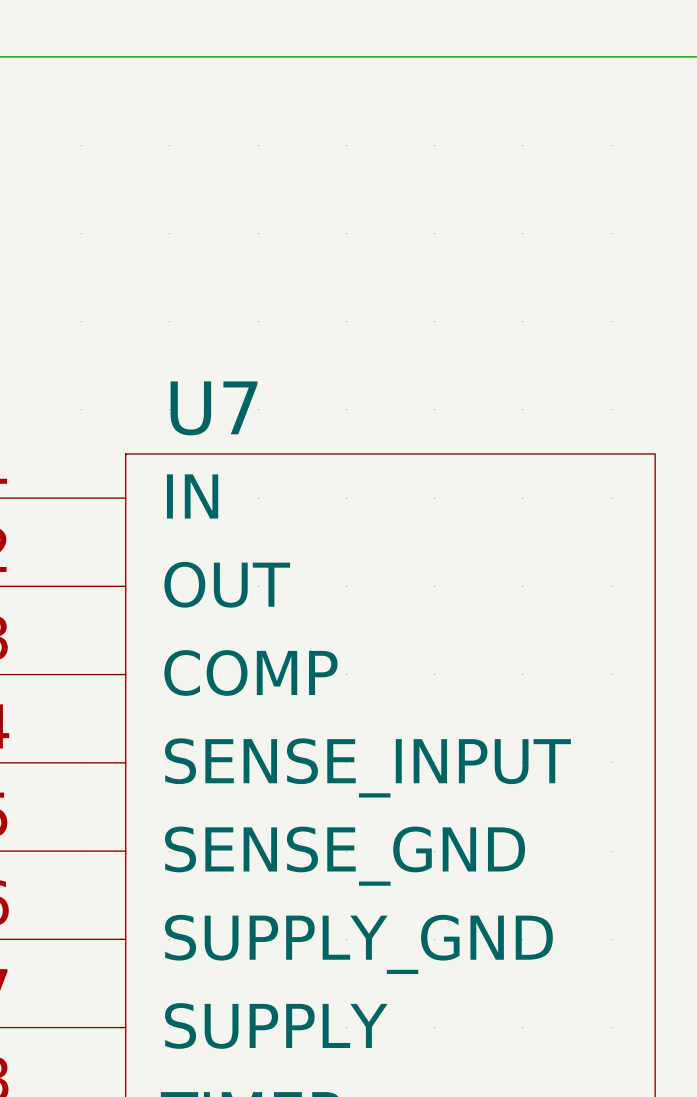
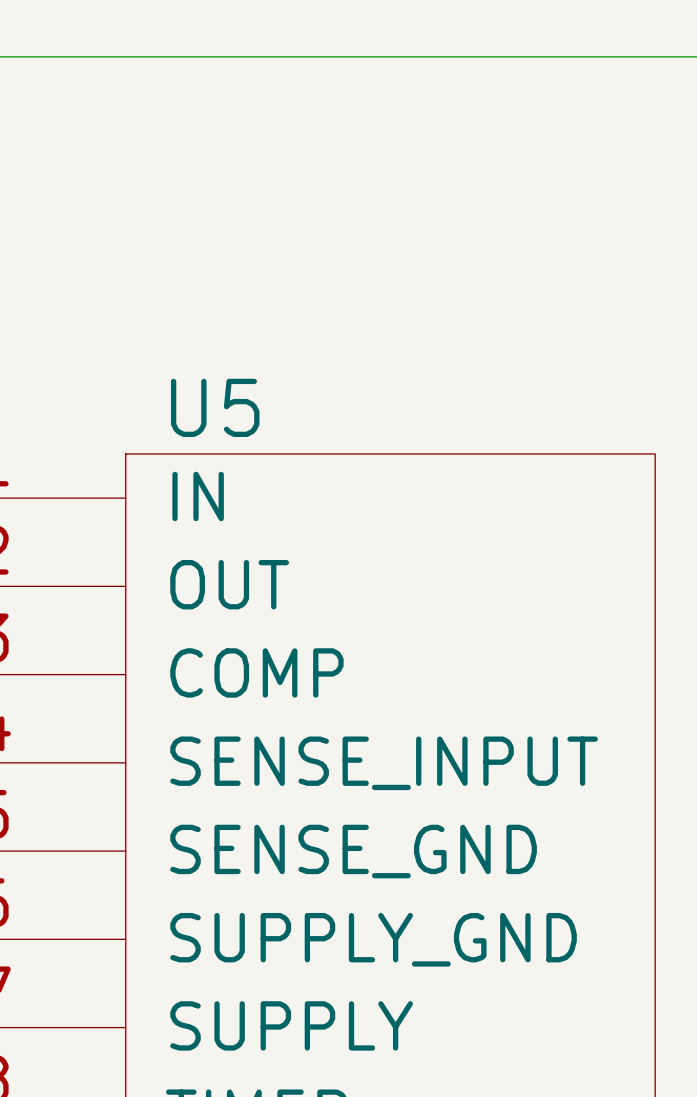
U7 name: U7 (214, 408) -> U5 (215, 407)

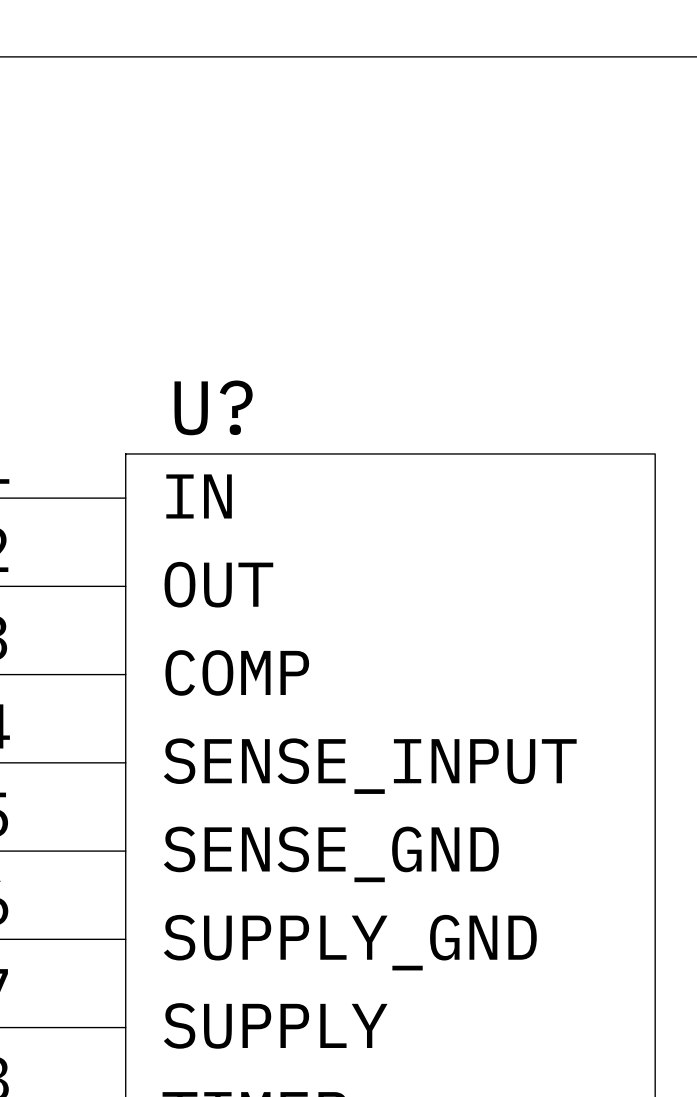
U5 name: U5 (215, 407) -> U? (213, 407)

